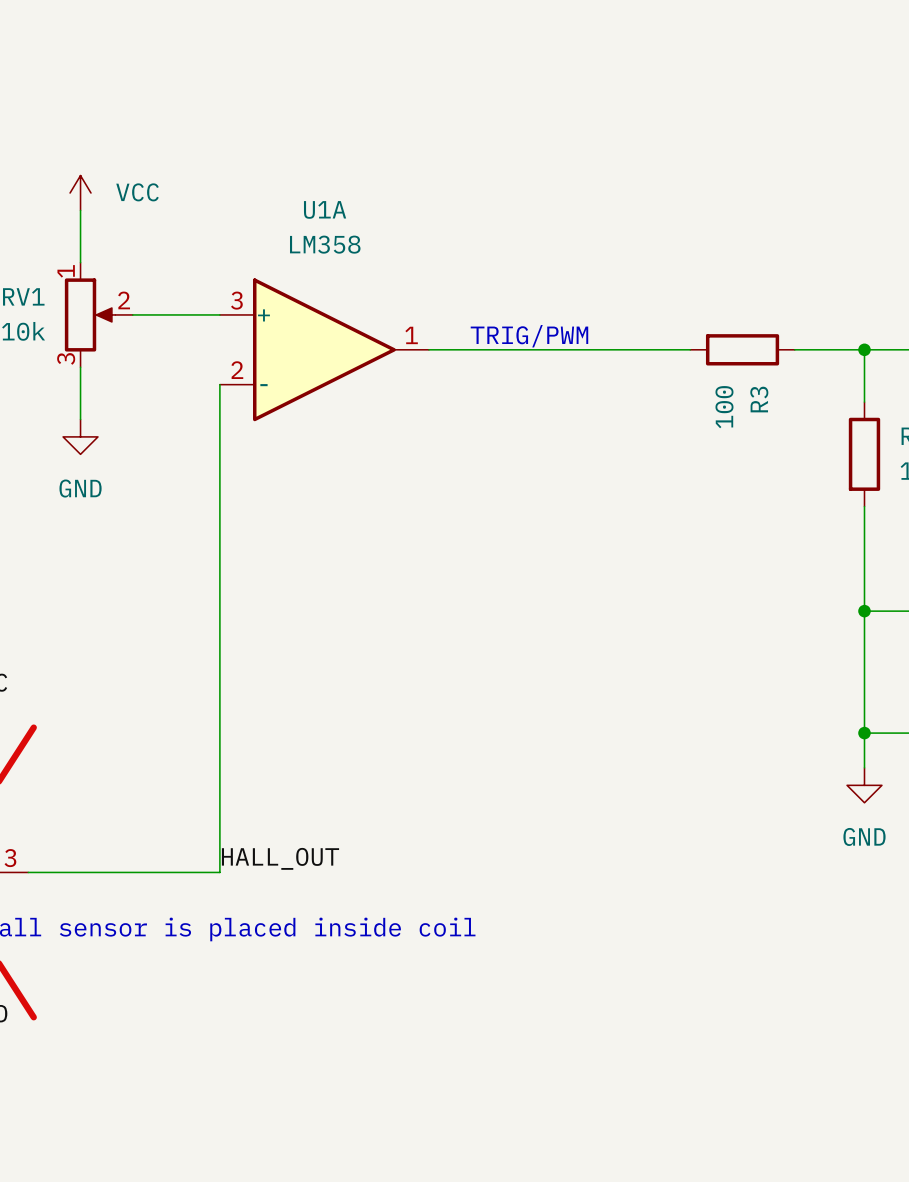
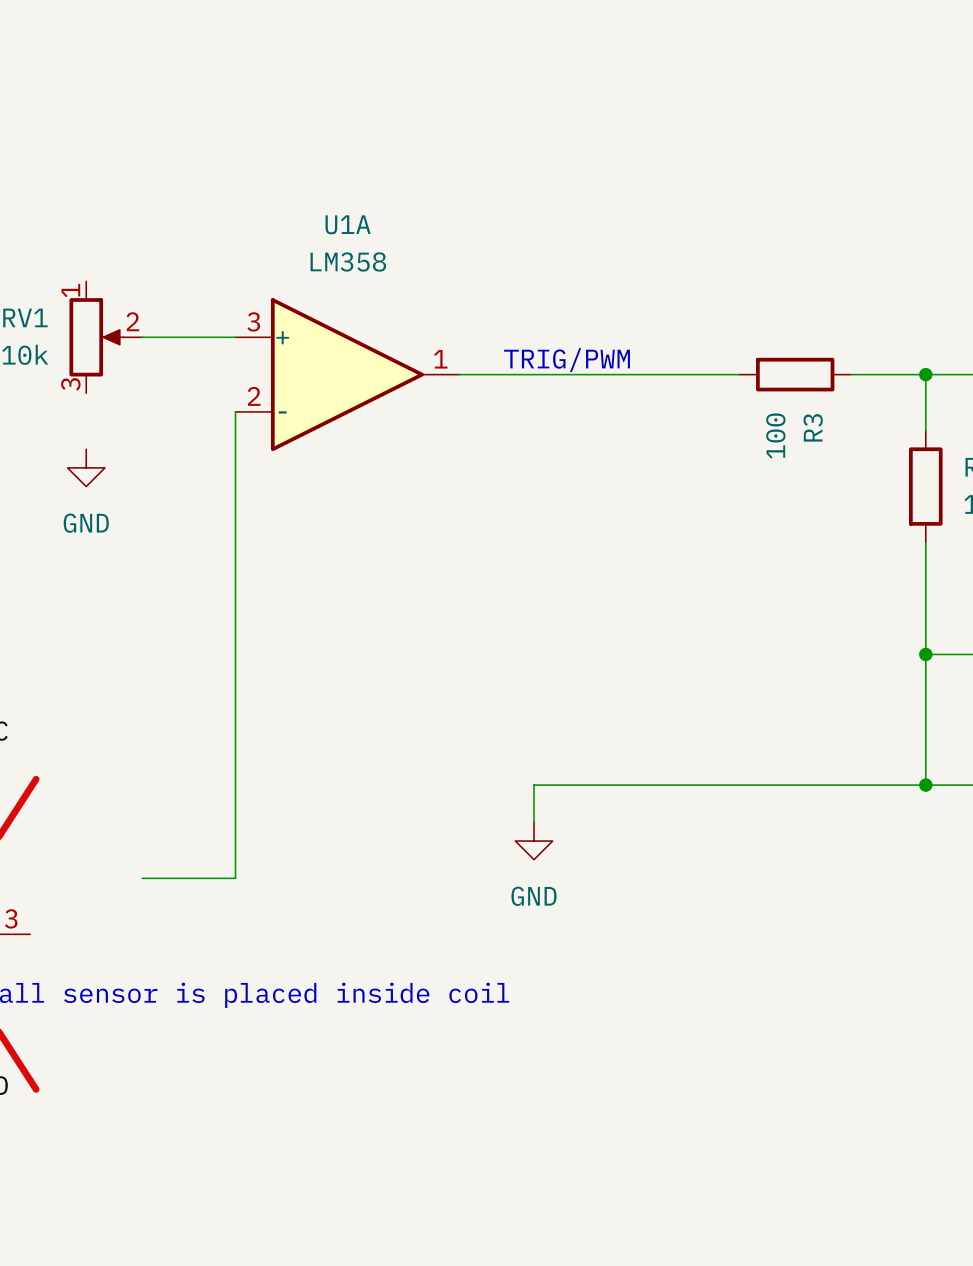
power symbol: VCC (80, 193) -> none
wire: (80, 210) (80, 262) -> none
wire: (80, 367) (80, 419) -> none
wire: (864, 733) (864, 767) -> (925, 785) (534, 785) (534, 822)
power symbol: none -> GND (534, 841)
power symbol: GND (864, 785) -> none
wire: (219, 820) (219, 872) (28, 872) -> (235, 878) (142, 878)
label: HALL_OUT (280, 858) -> none

